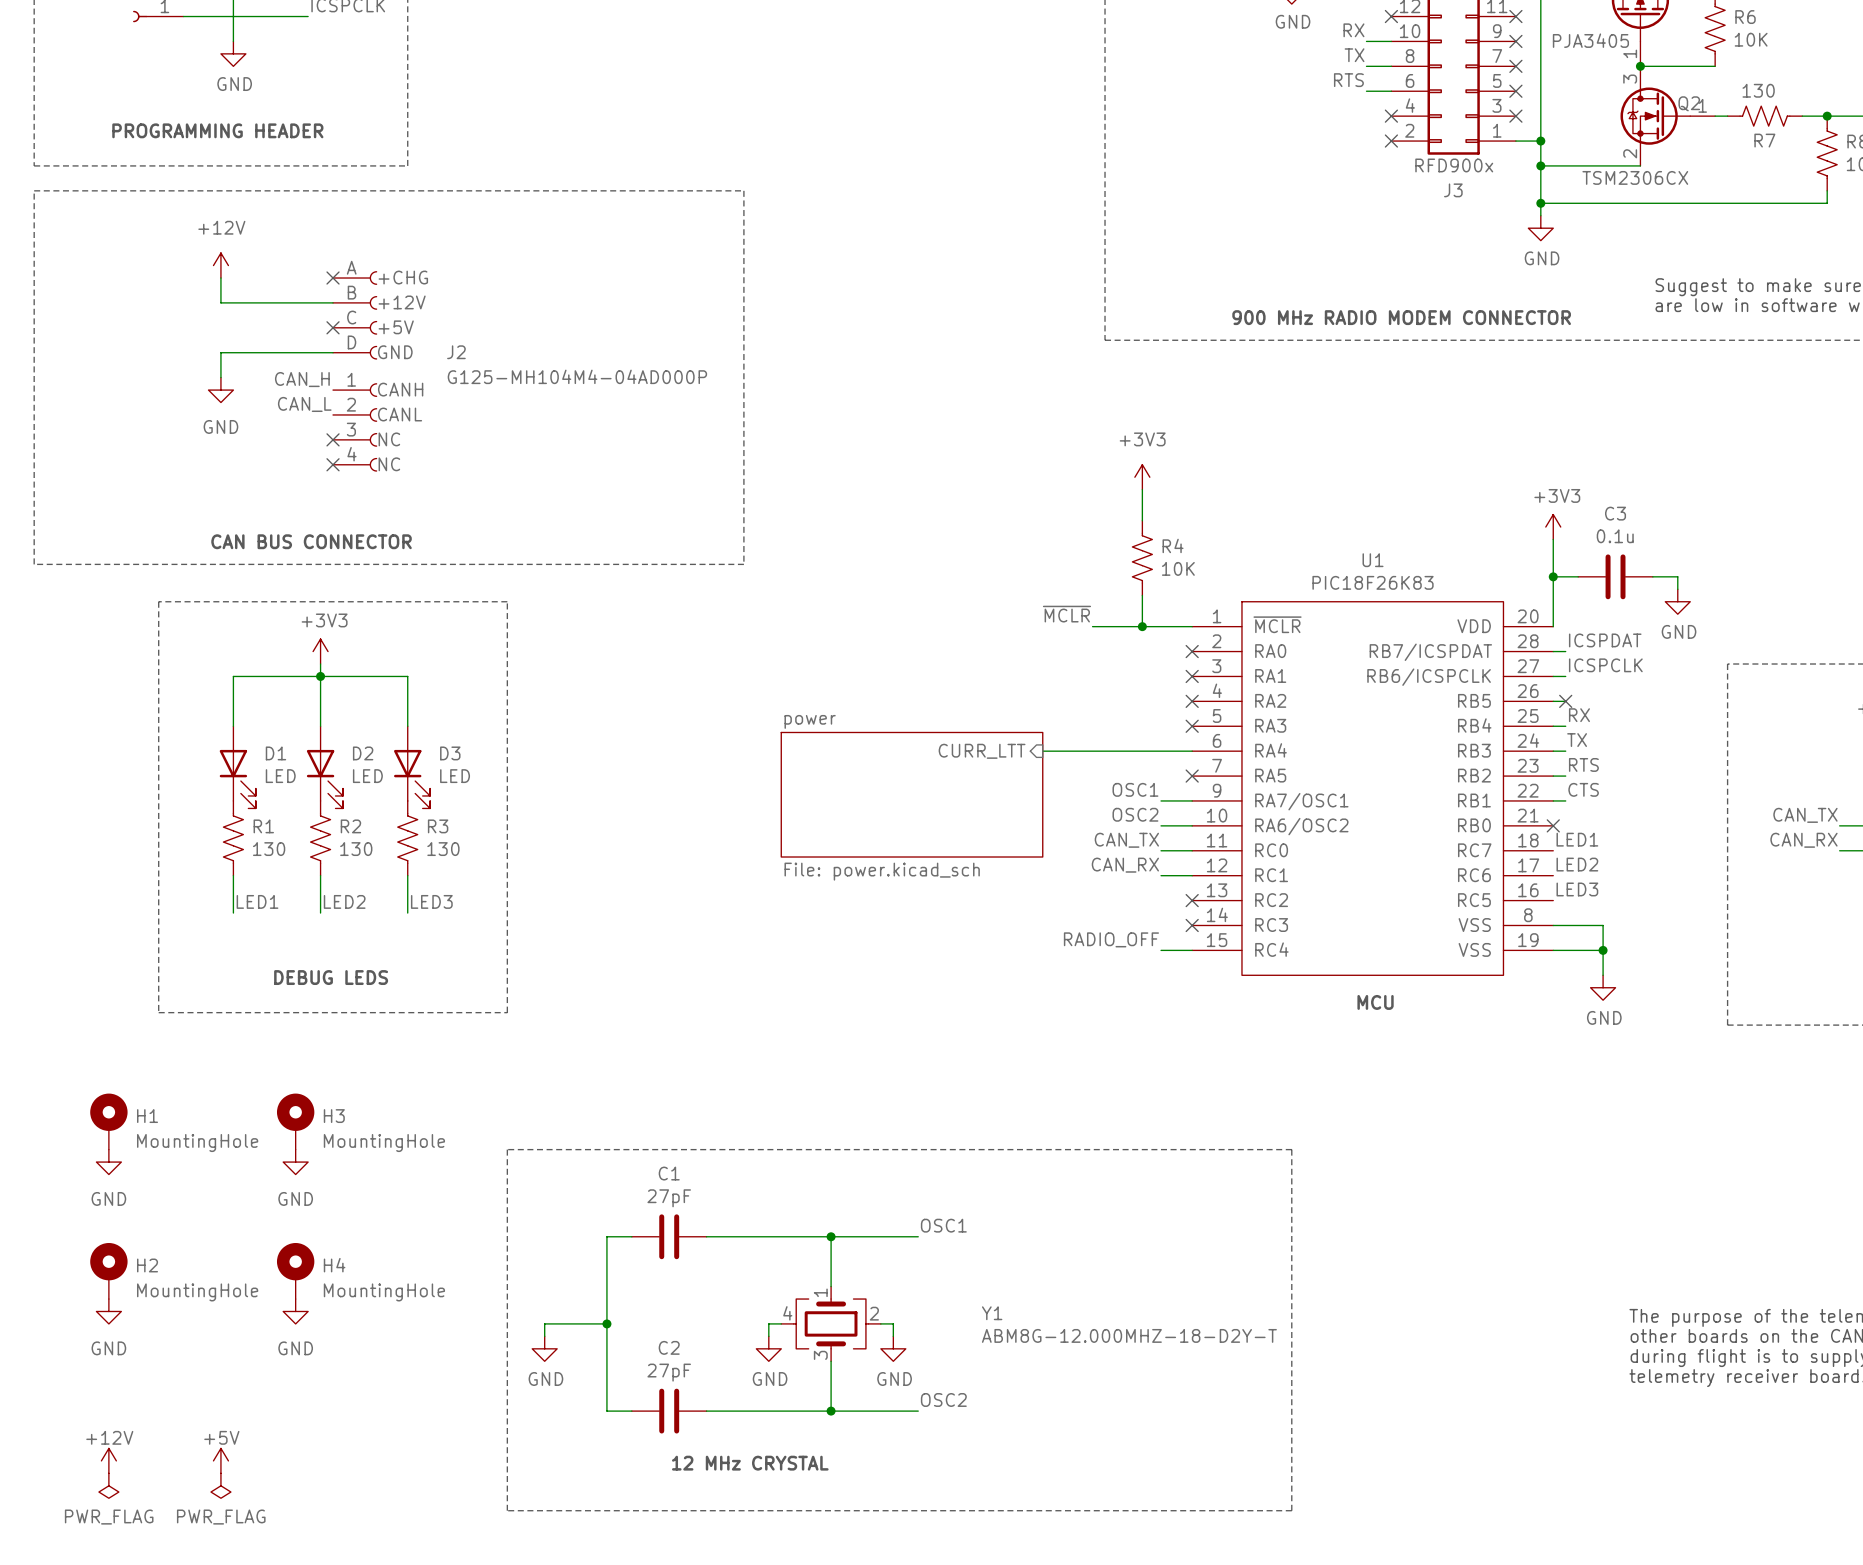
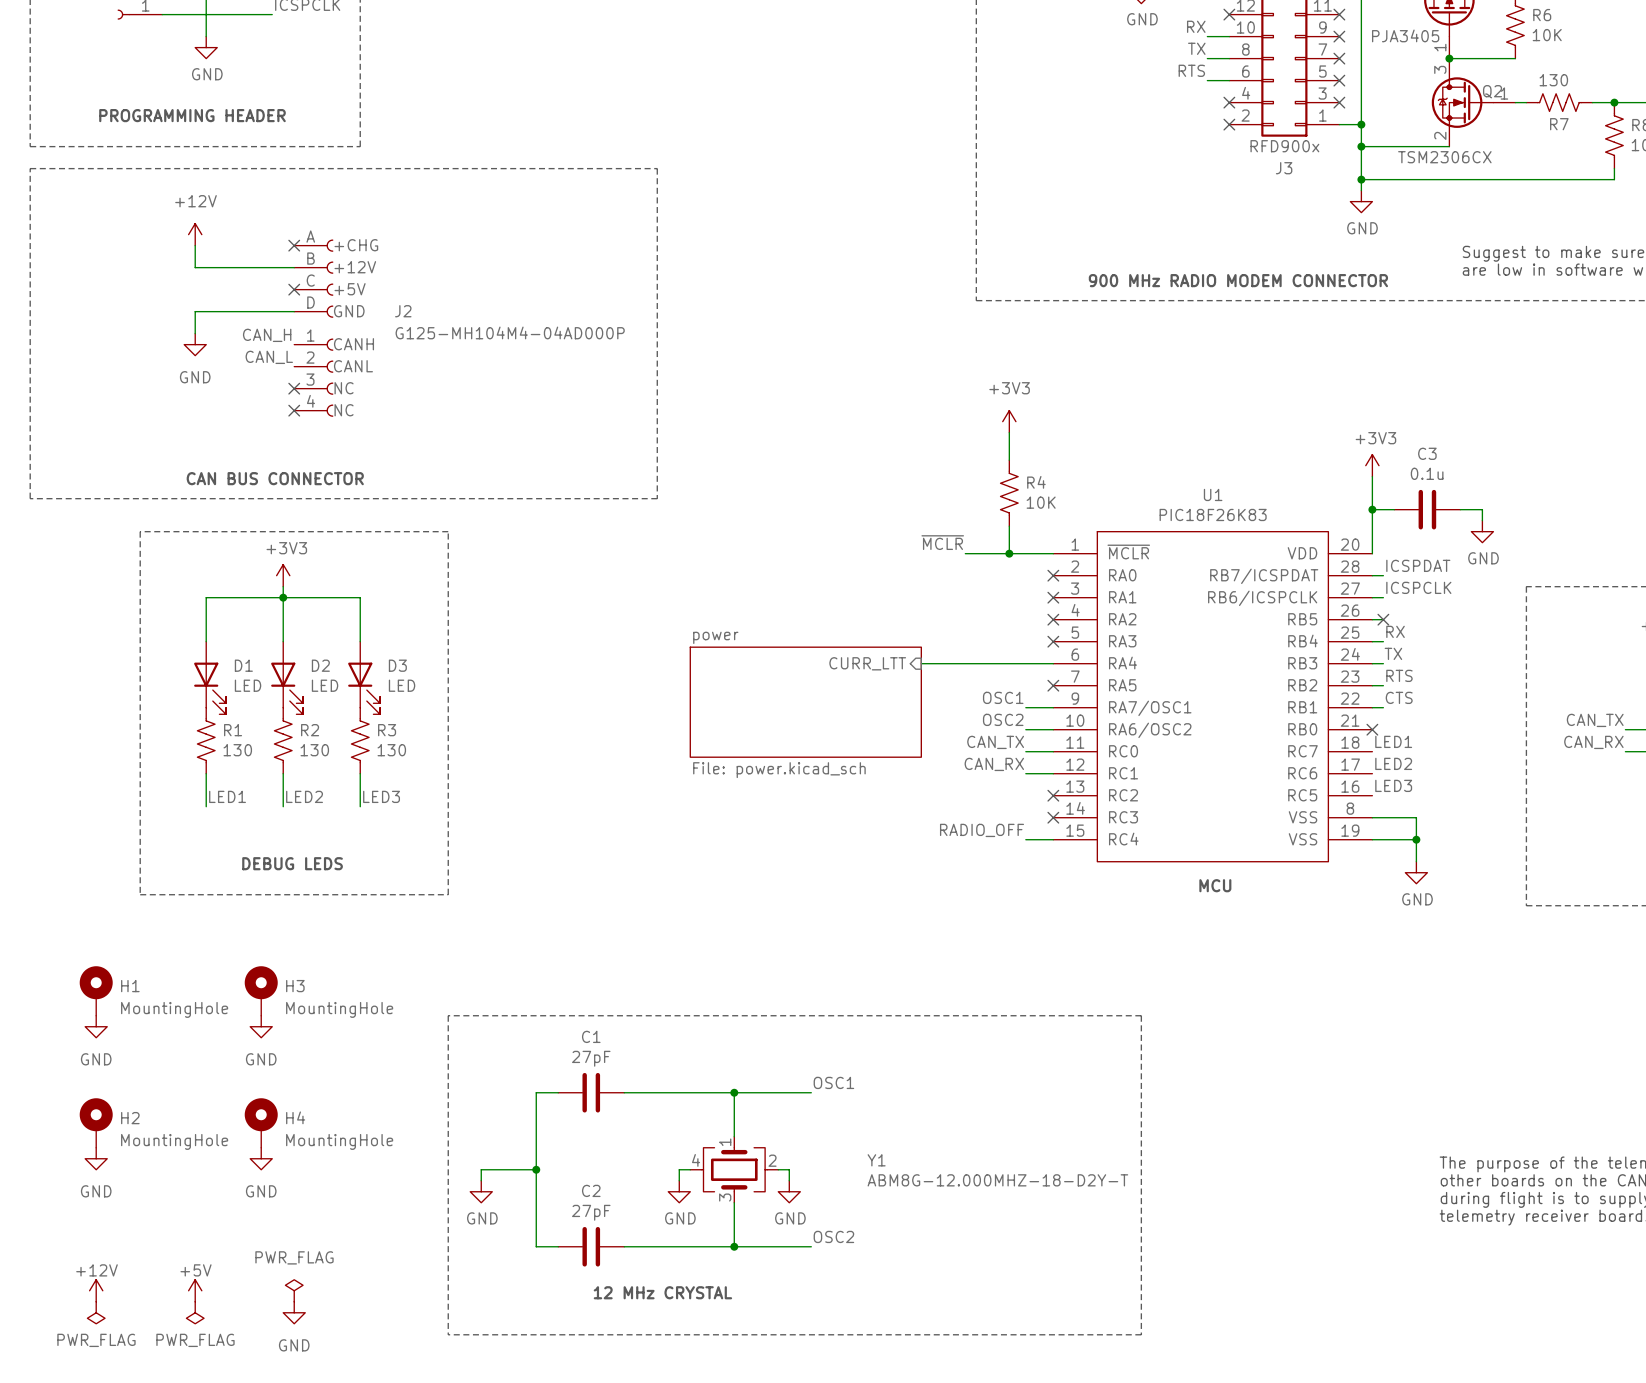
power symbol: none -> PWR_FLAG (294, 1290)
power symbol: none -> GND (294, 1312)

